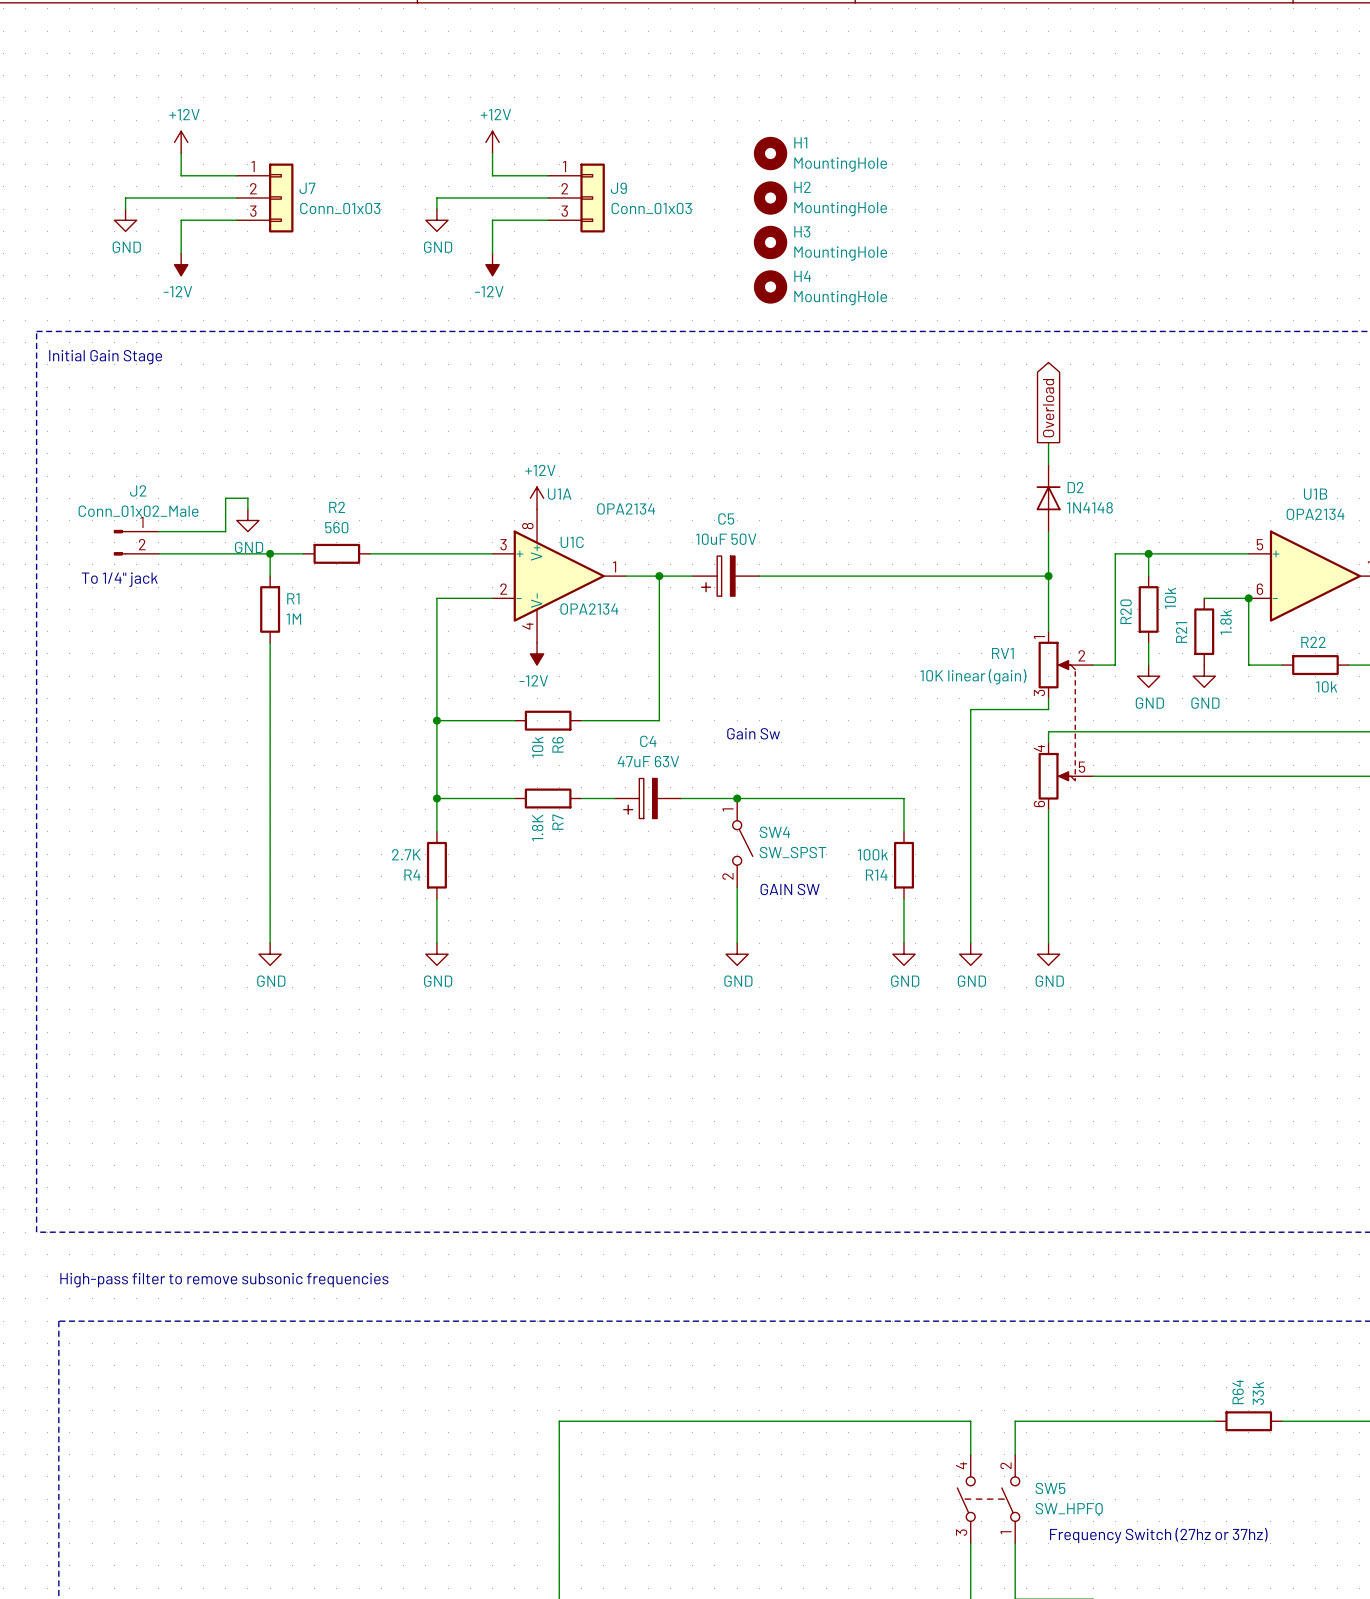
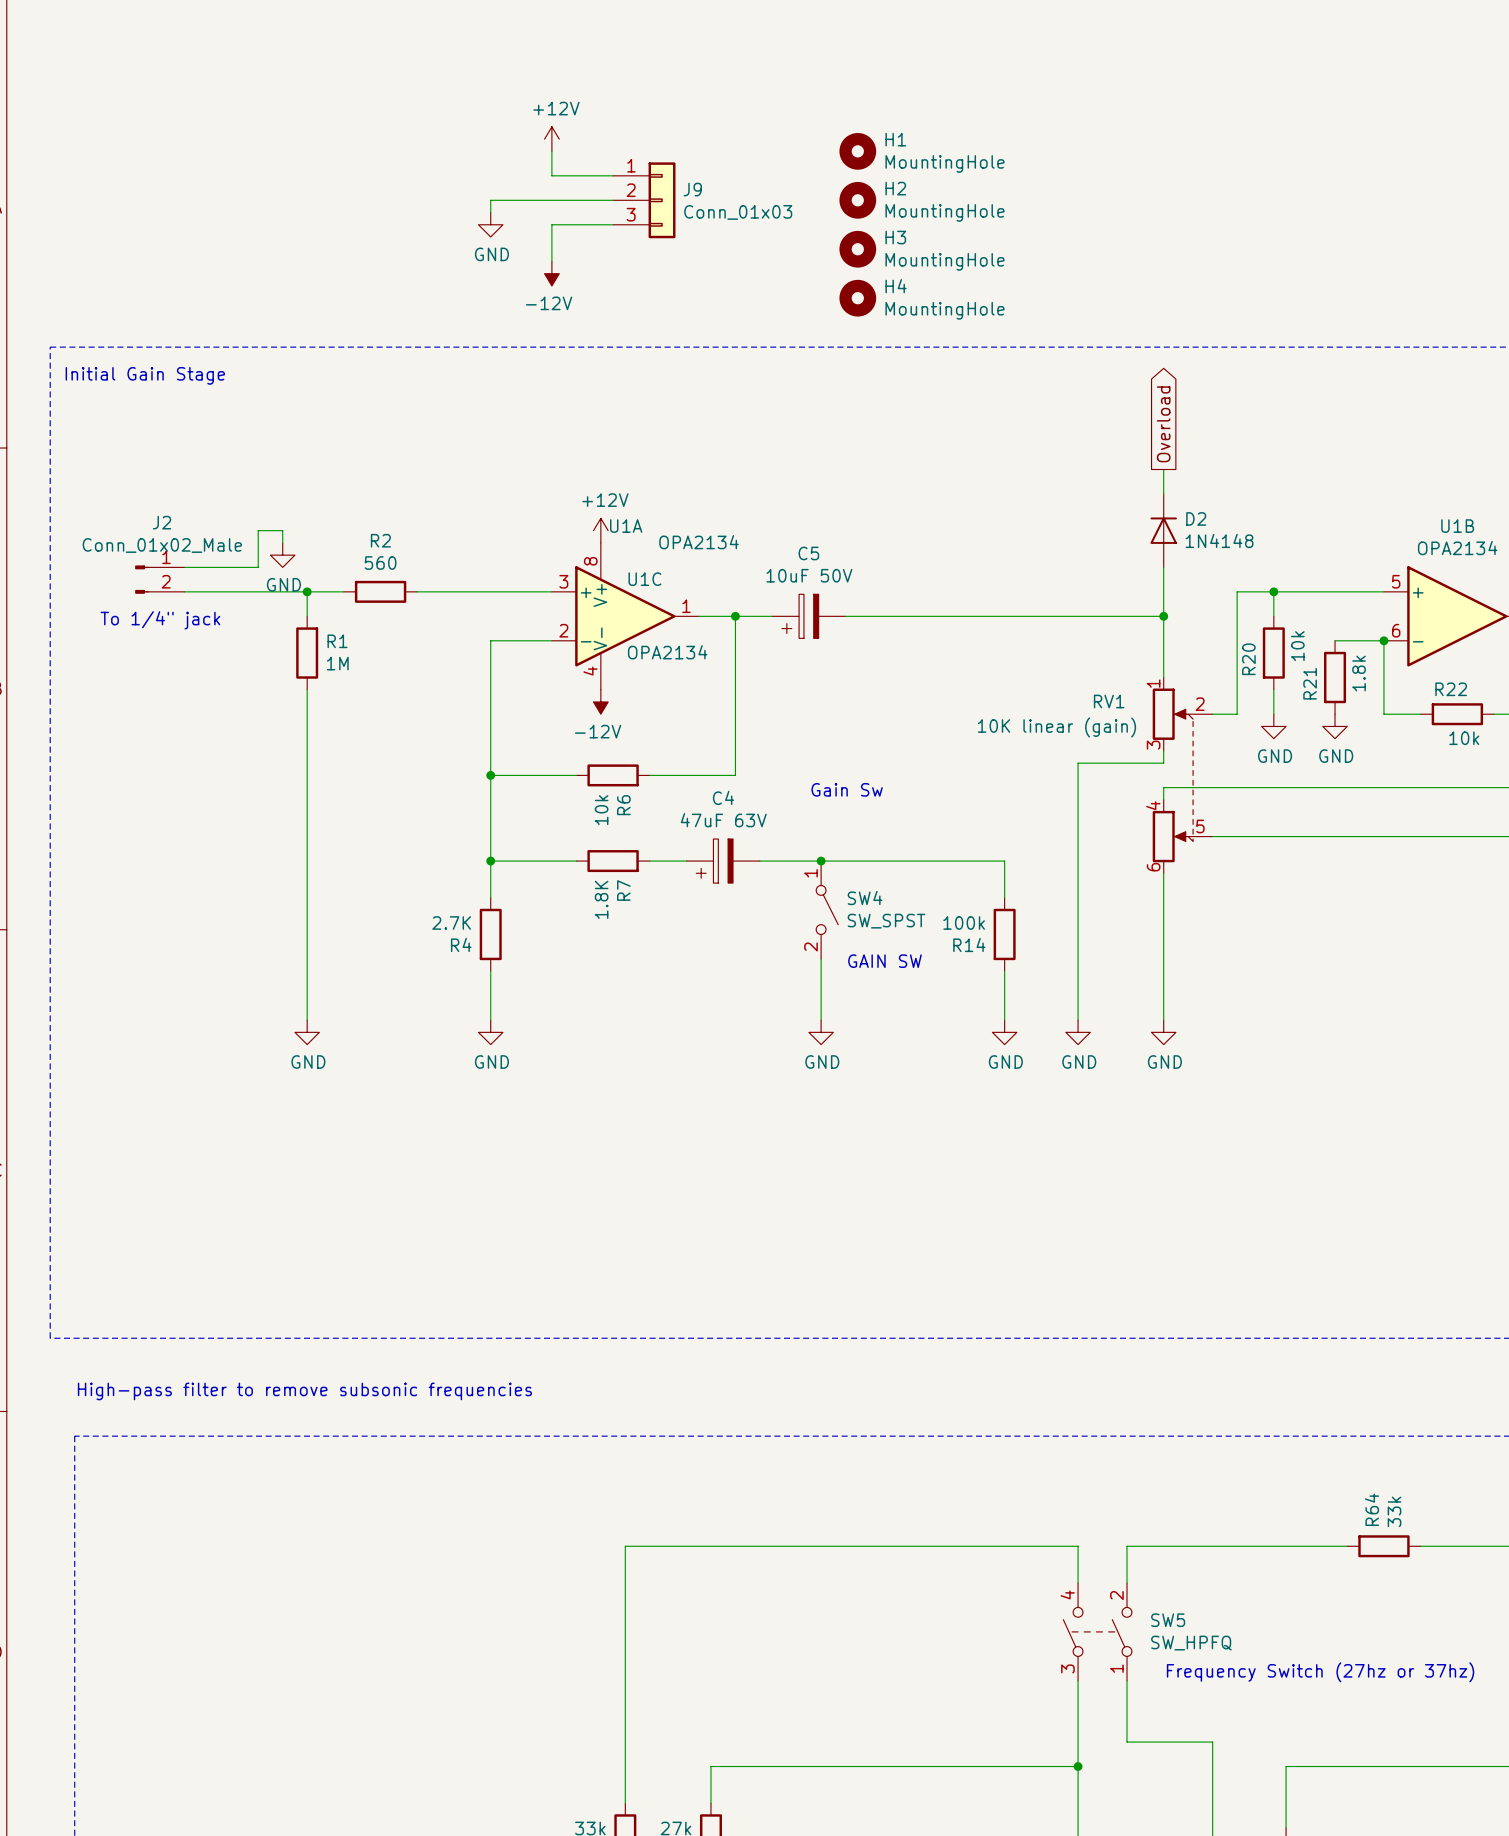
power symbol: +12V (181, 142) -> none
wire: (181, 153) (181, 175) (236, 175) -> none
wire: (236, 198) (125, 198) (125, 209) -> none
J7: Conn_01x03 (265, 198) -> none
power symbol: GND (125, 220) -> none
wire: (236, 220) (181, 220) (181, 253) -> none
power symbol: -12V (181, 264) -> none

